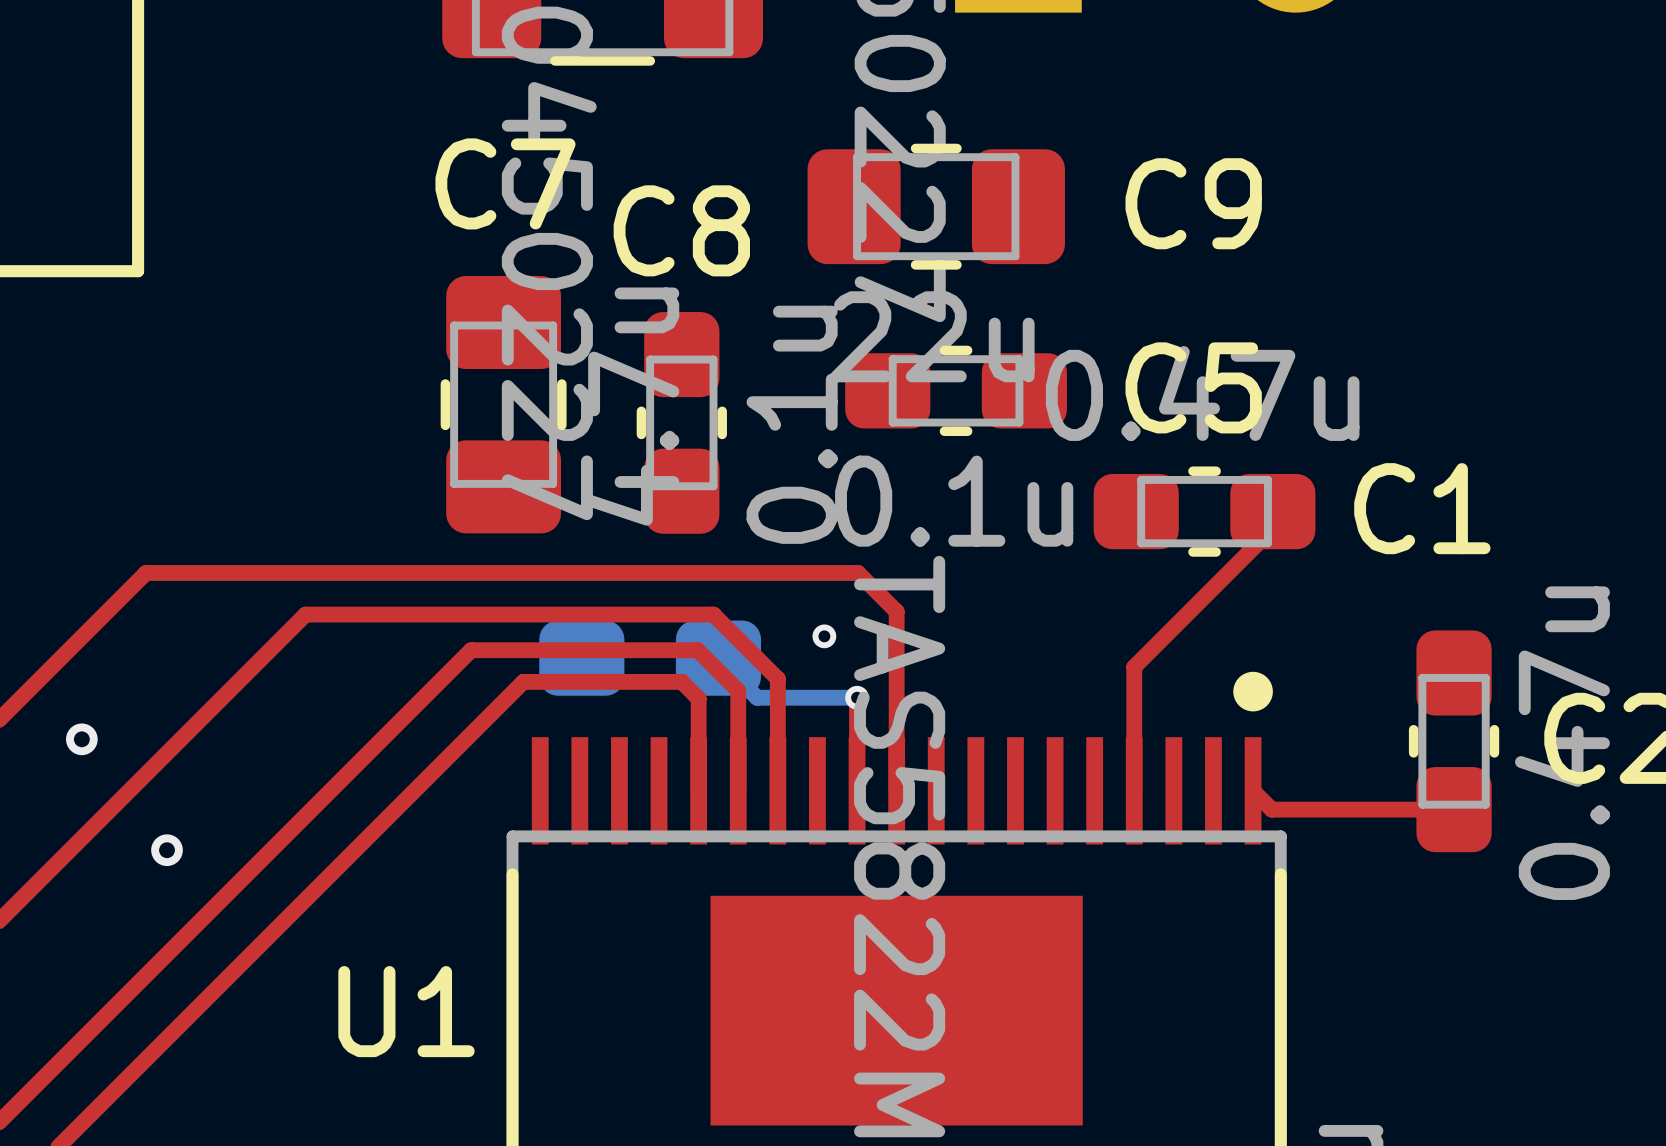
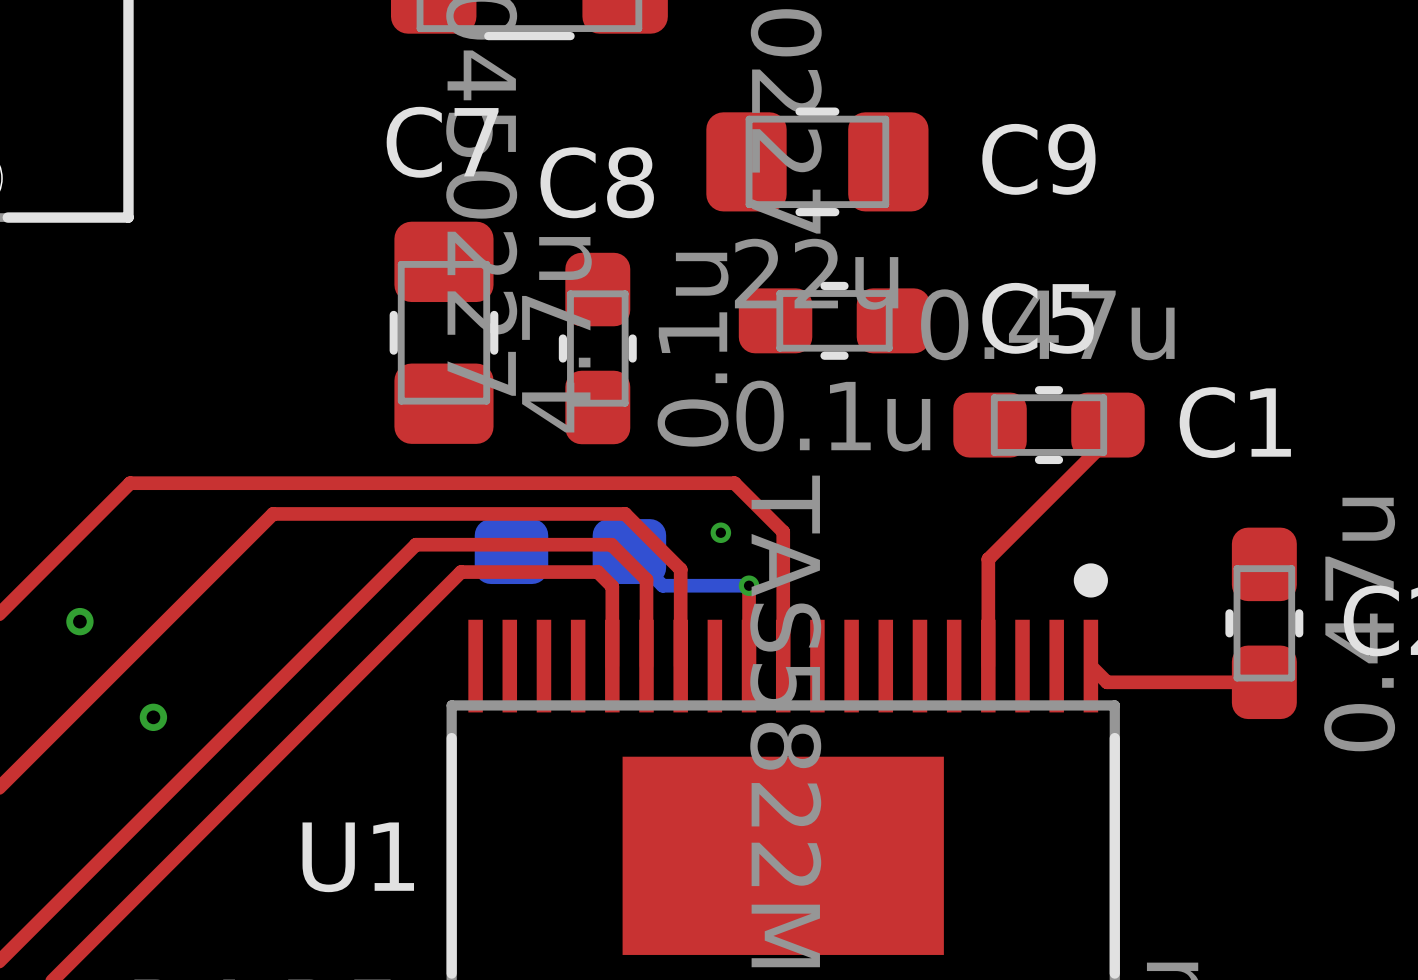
top track: (140, 578) (146, 572) (858, 572) (896, 611) (896, 635) -> (130, 483) (734, 483) (783, 531)

